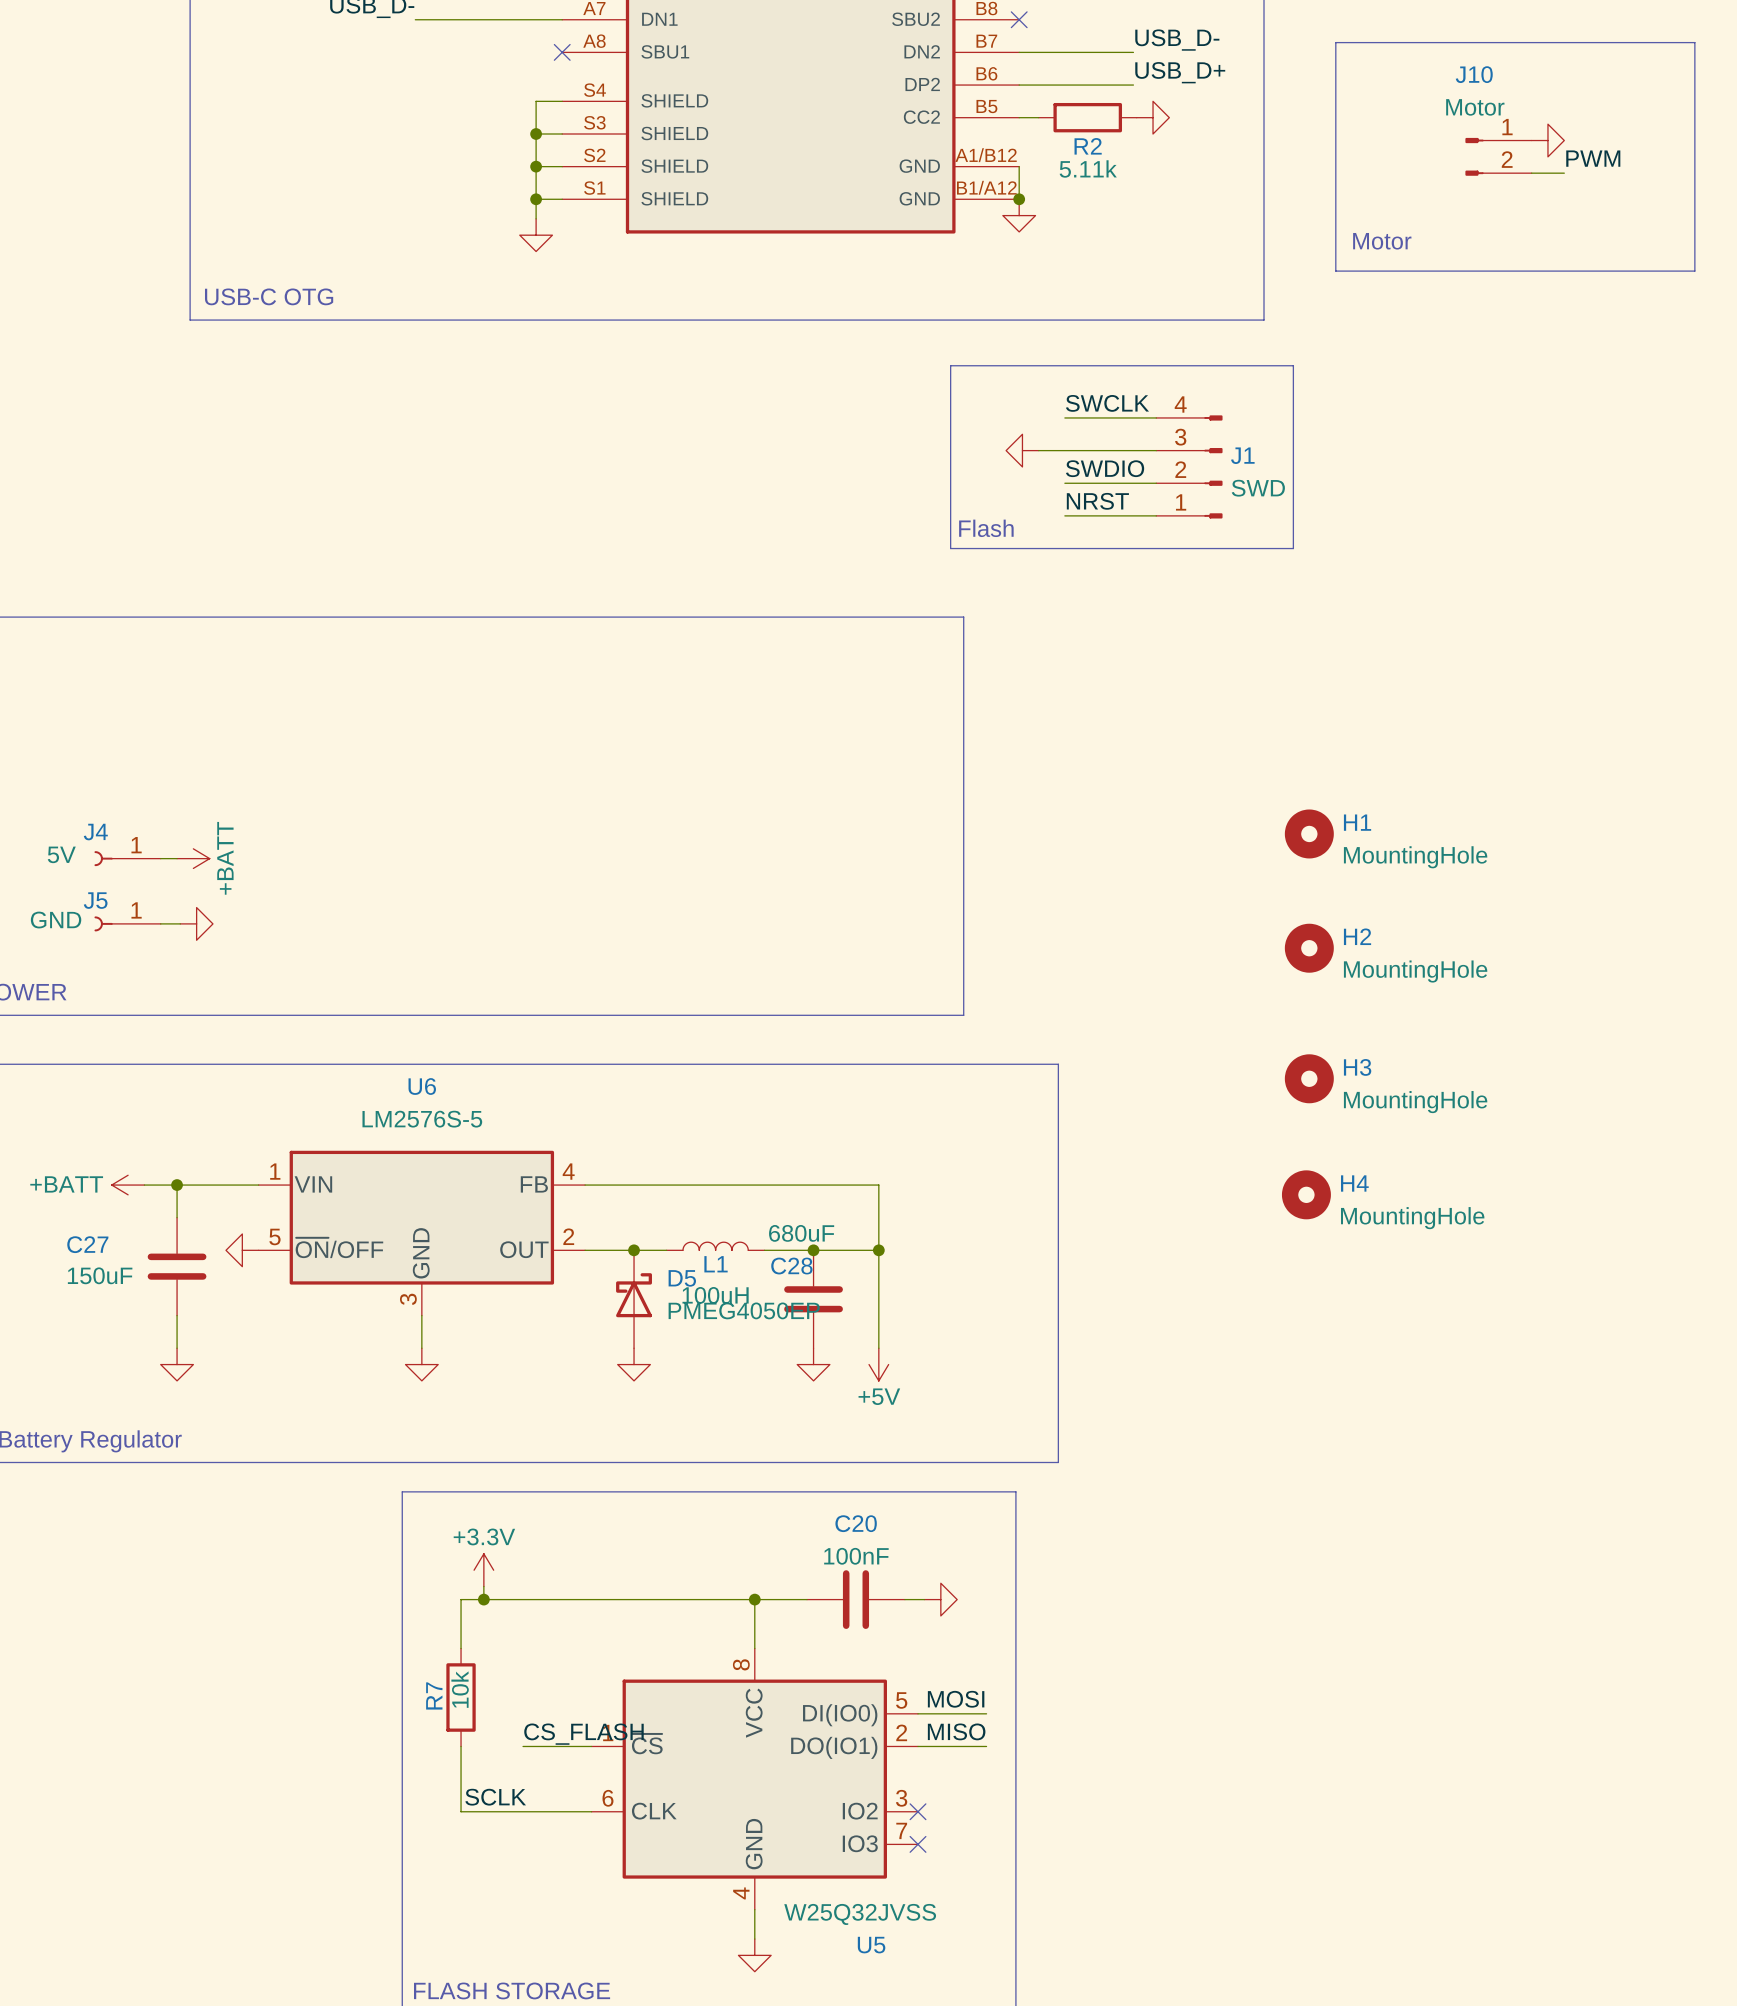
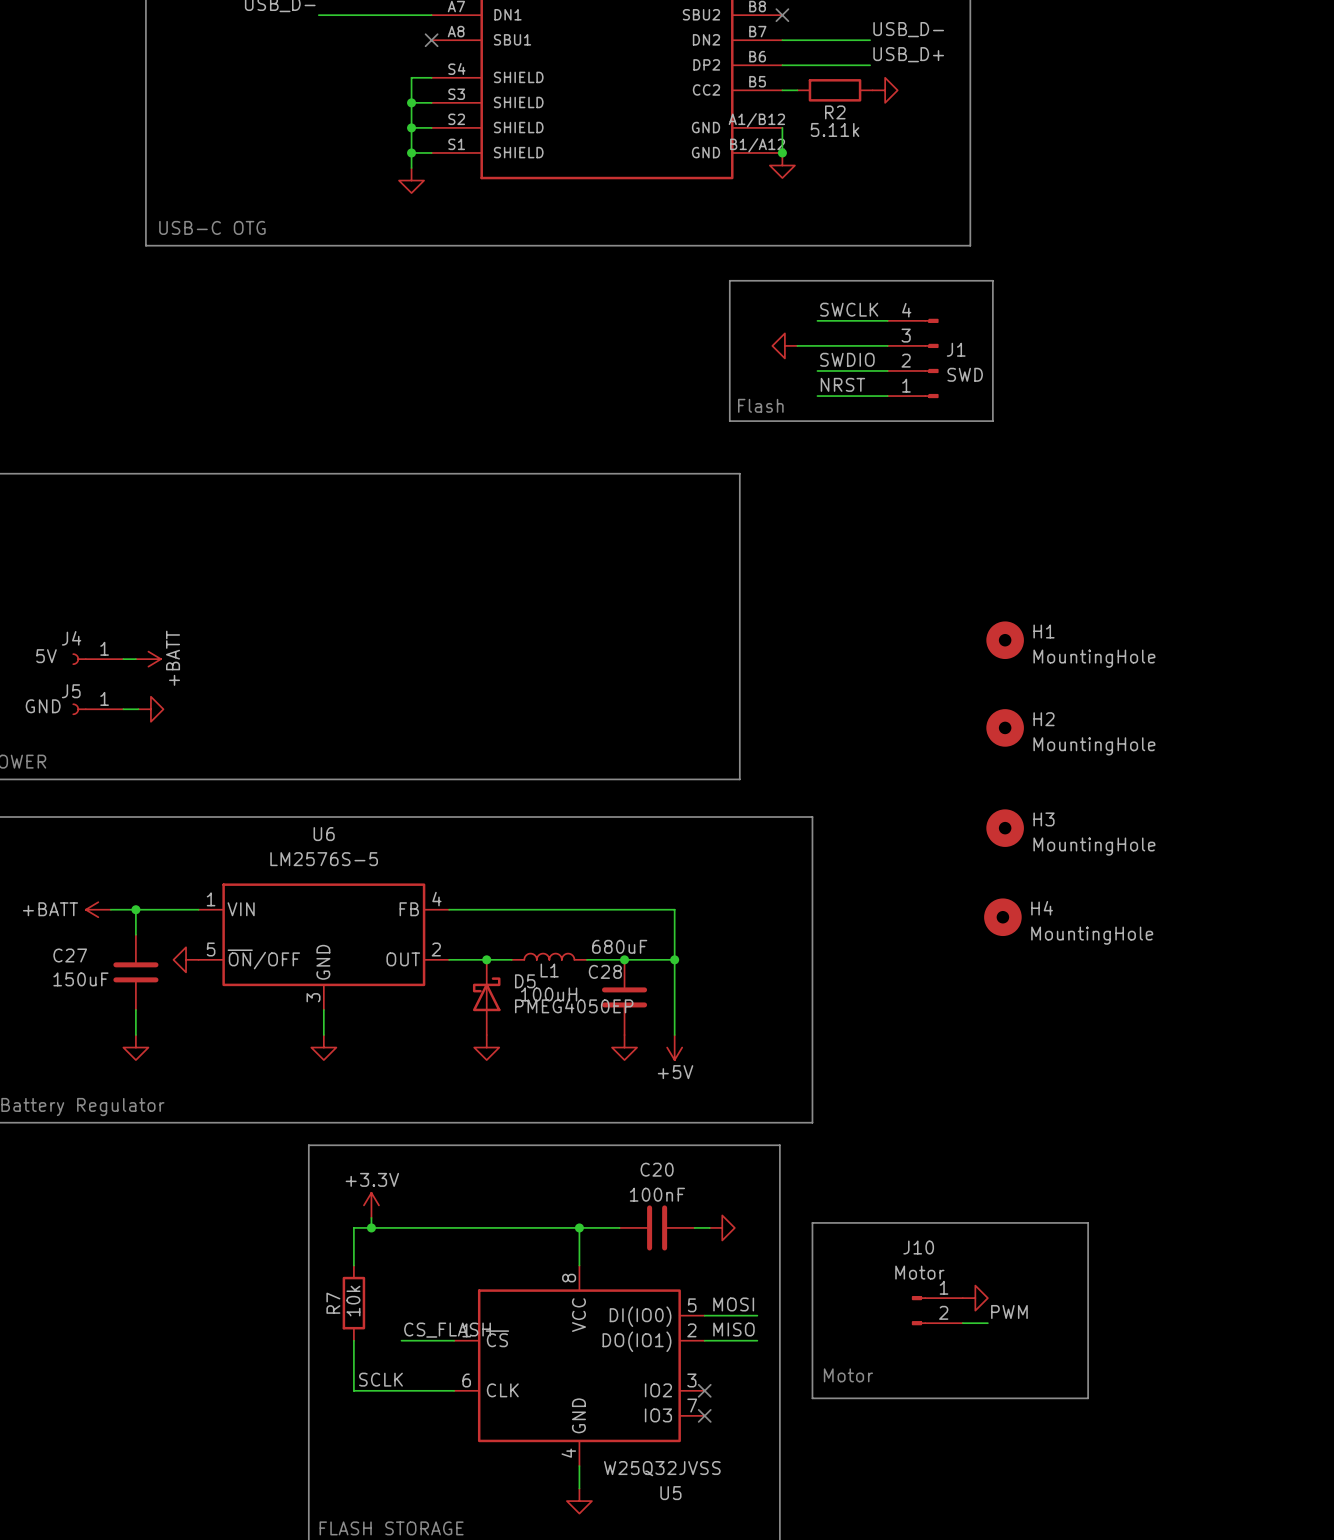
line: (1335, 42) (1694, 42) (1694, 271) (1335, 271) (1335, 42) -> none
power symbol: (1547, 140) -> none
J10 position: (1498, 156) -> (937, 1310)
label: PWM (1593, 158) -> none
wire: (1531, 173) (1564, 173) -> none
text: Motor (1382, 241) -> none
line: none -> (812, 1222) (1088, 1222) (1088, 1398) (812, 1398) (812, 1222)
power symbol: none -> (975, 1298)
label: none -> PWM (1009, 1311)
wire: none -> (962, 1323) (987, 1323)
text: none -> Motor (848, 1375)

